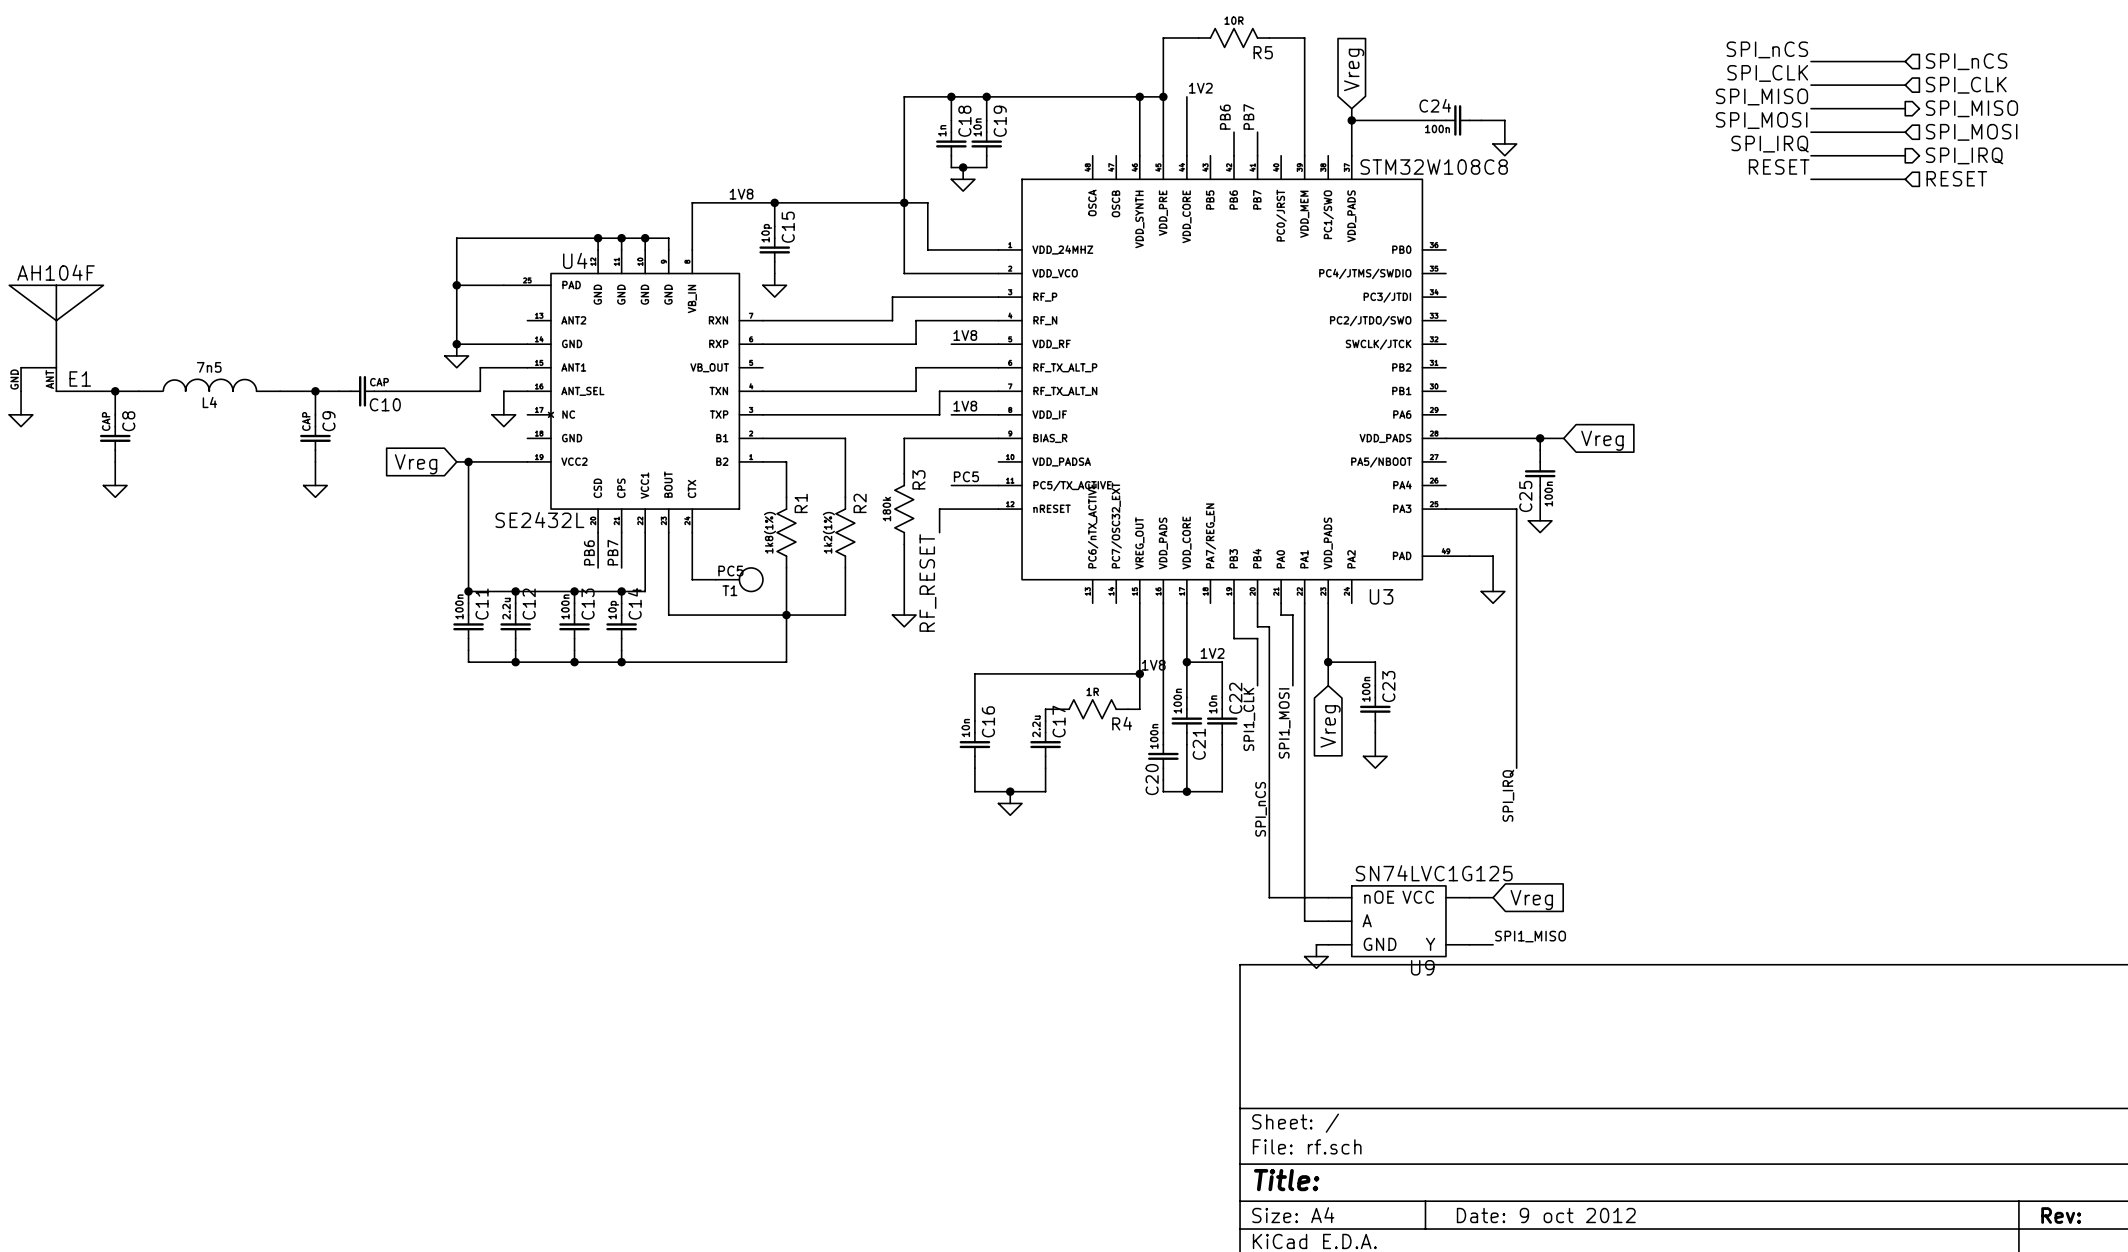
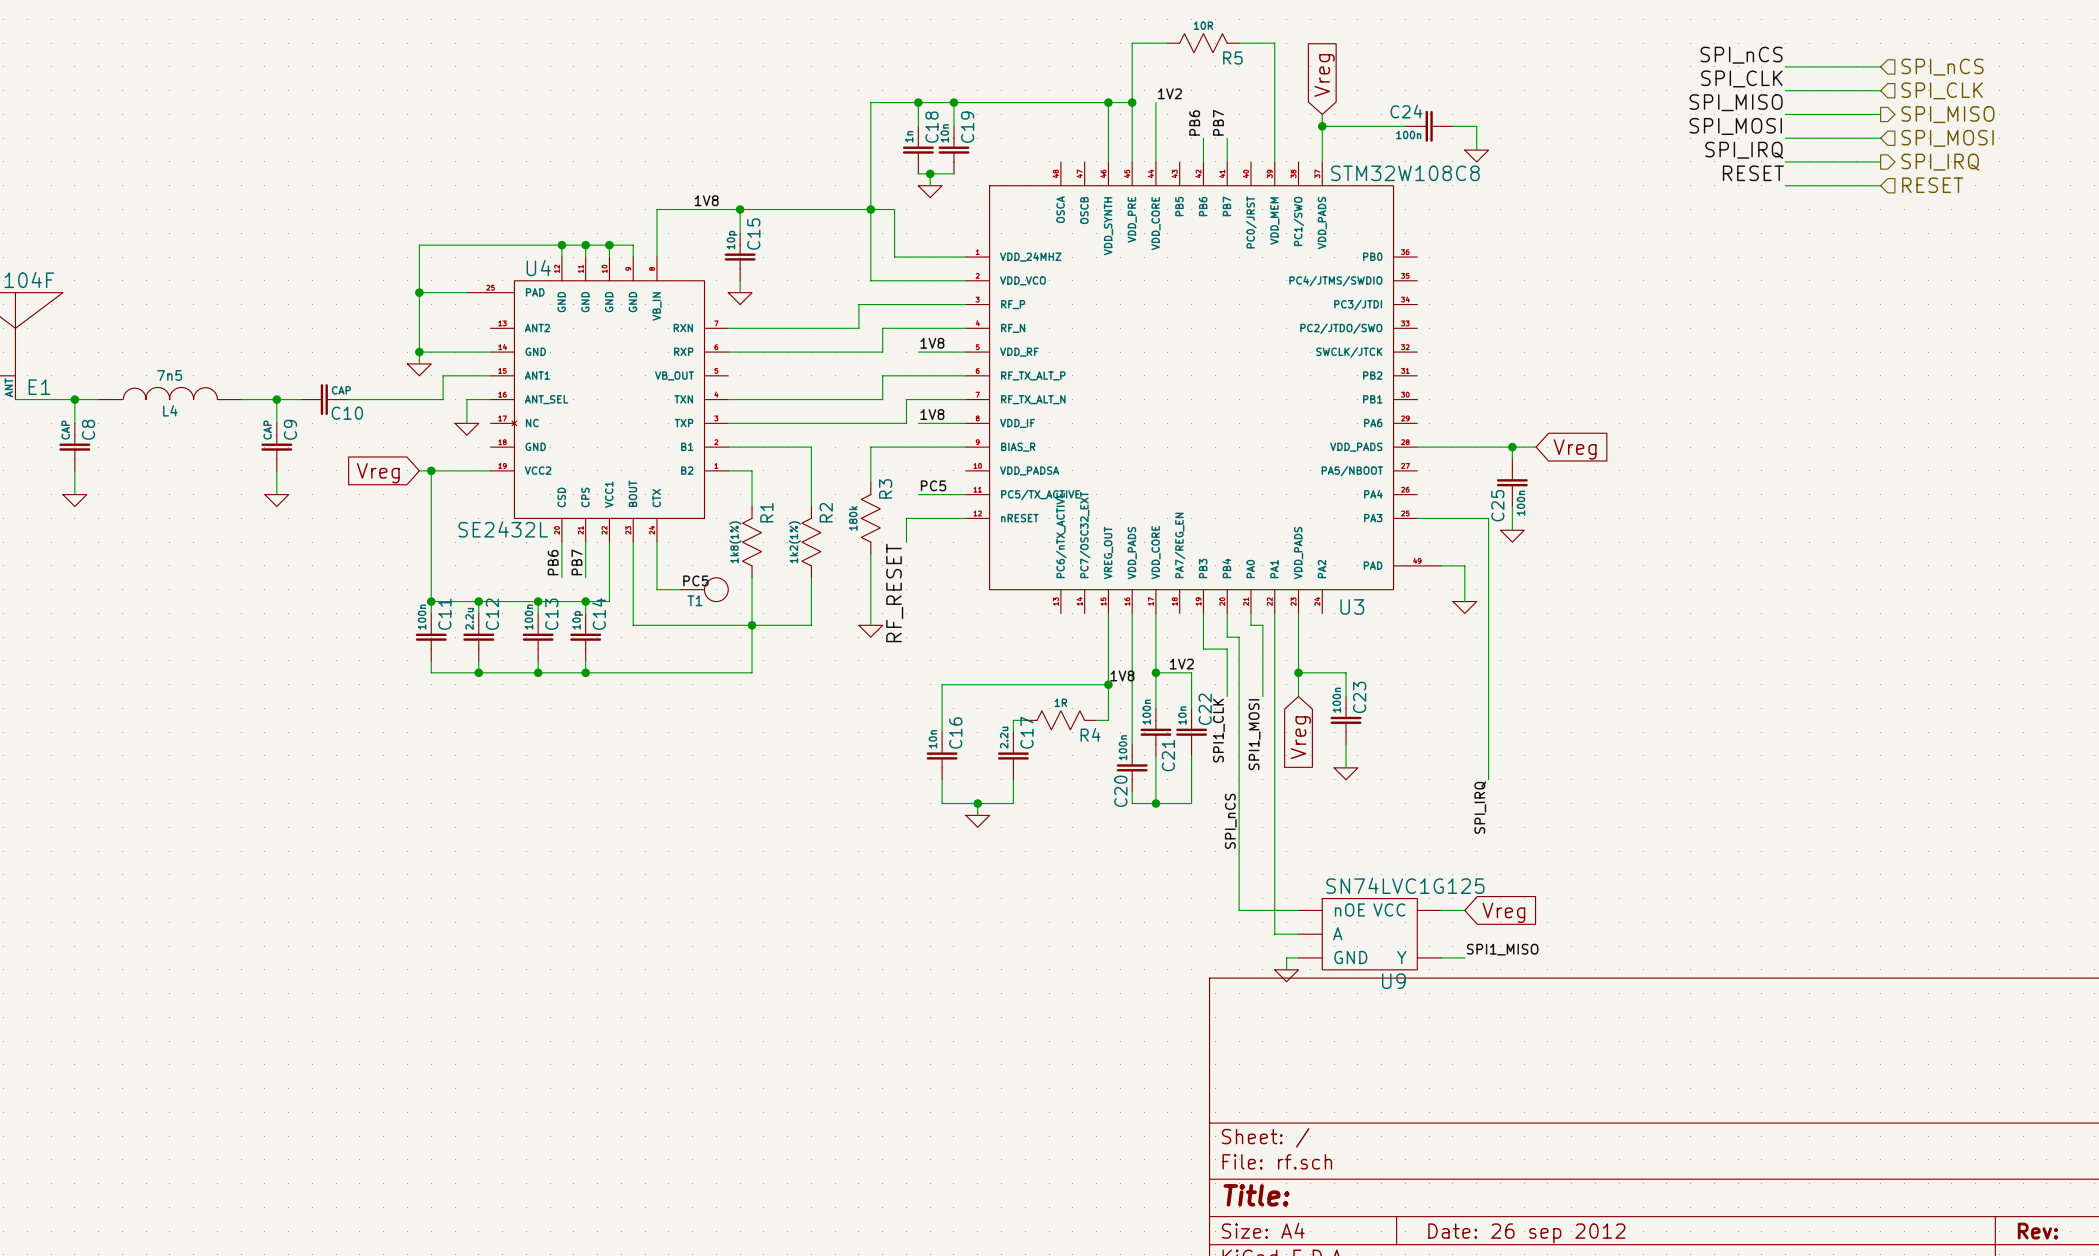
title block: Date: 9 oct 2012 (1546, 1215) -> Date: 26 sep 2012 (1526, 1233)

